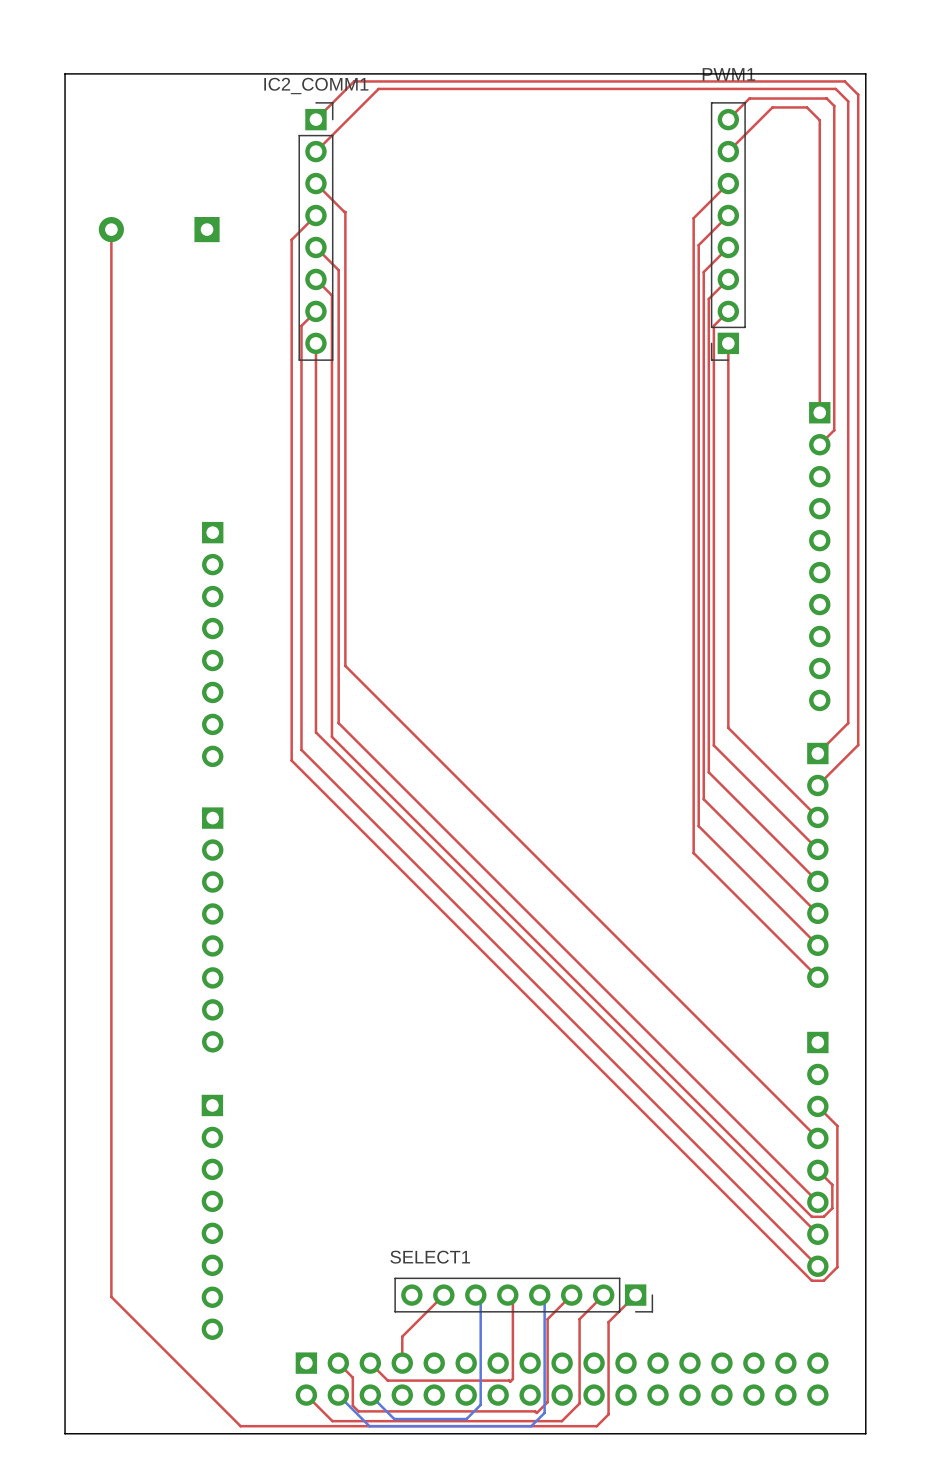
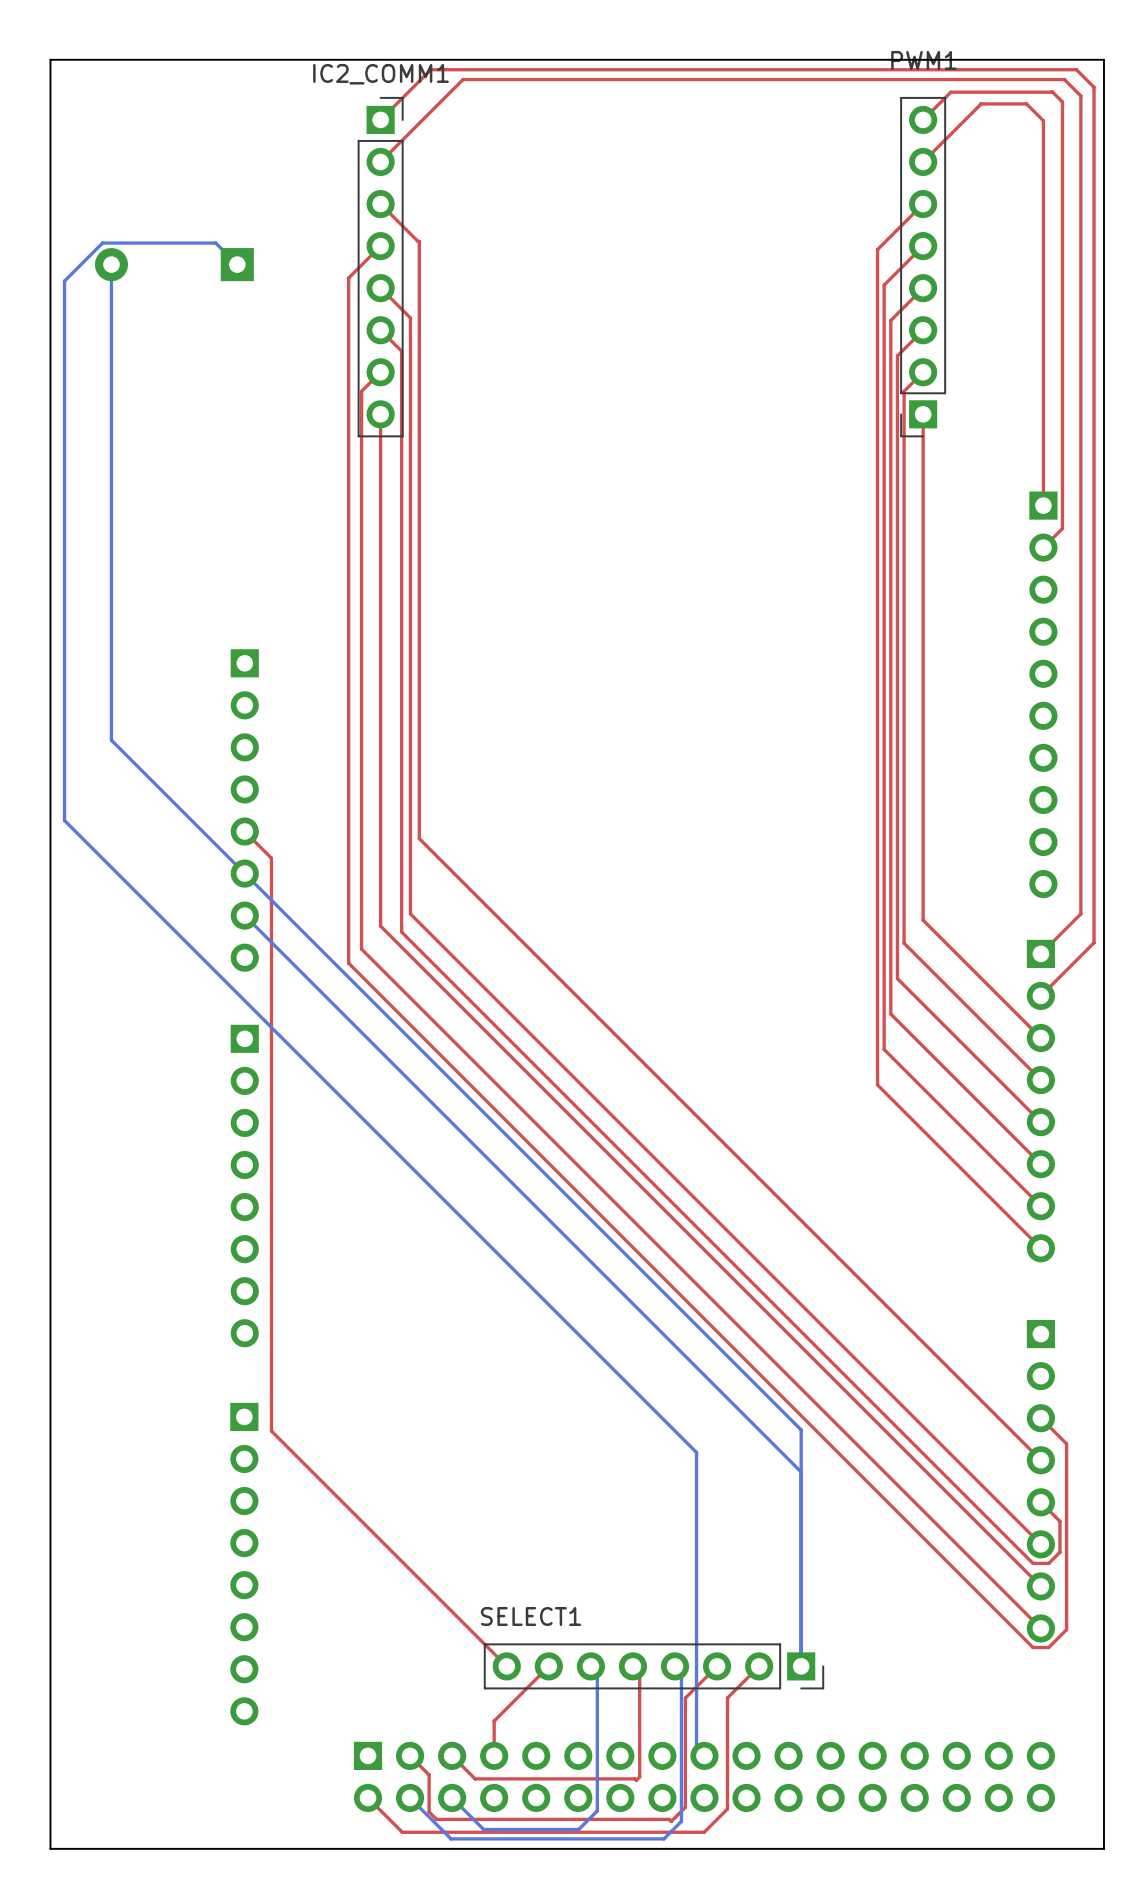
top track: (111, 229) (111, 1296) (240, 1426) (596, 1426) (608, 1414) (608, 1322) (635, 1295) -> none
bottom track: none -> (111, 264) (111, 740) (801, 1429) (801, 1666)
bottom track: none -> (237, 264) (215, 243) (102, 243) (64, 281) (64, 820) (696, 1452) (696, 1748) (704, 1755)
top track: none -> (244, 831) (271, 858) (271, 1431) (506, 1666)
bottom track: none -> (244, 915) (801, 1472)

